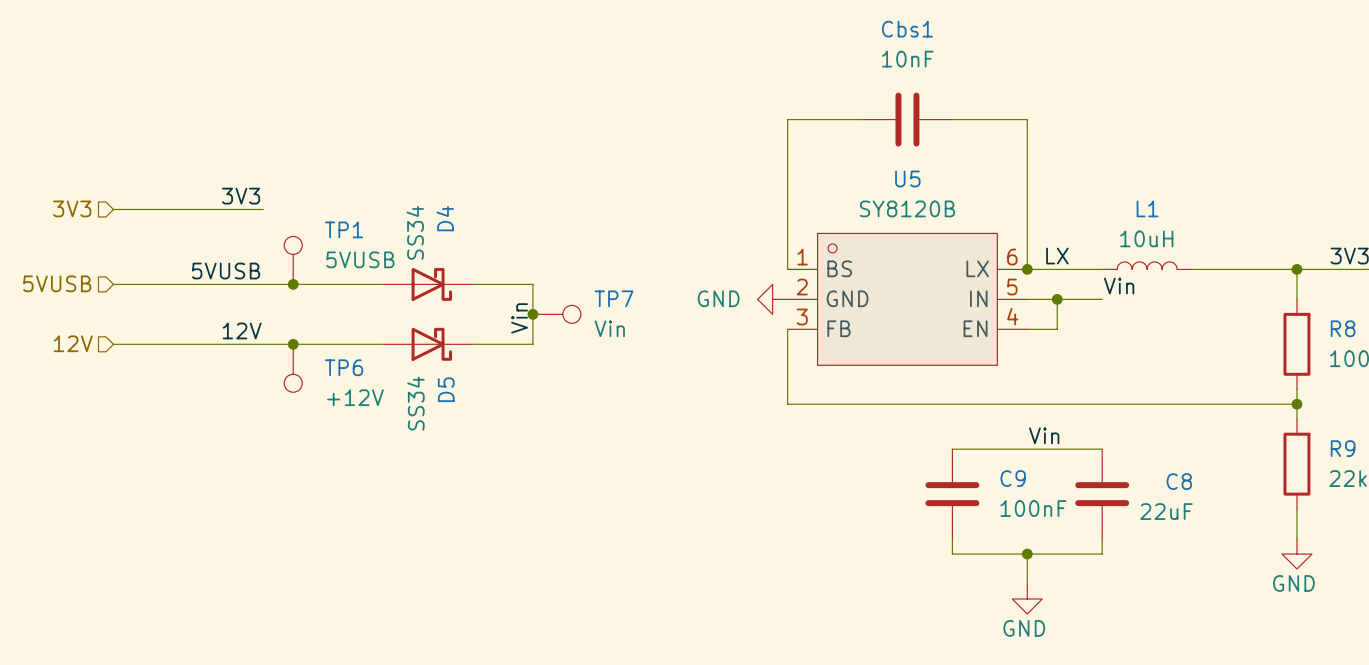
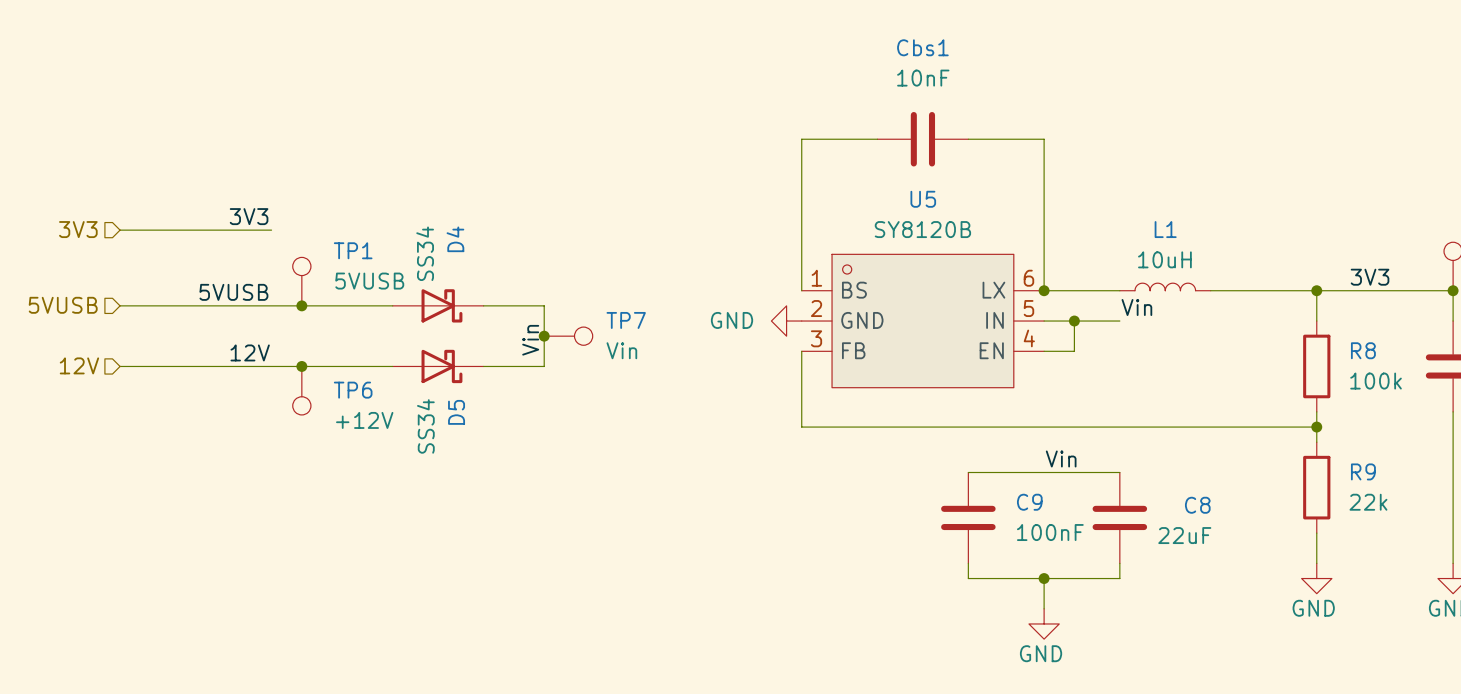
label: LX (1057, 256) -> none

